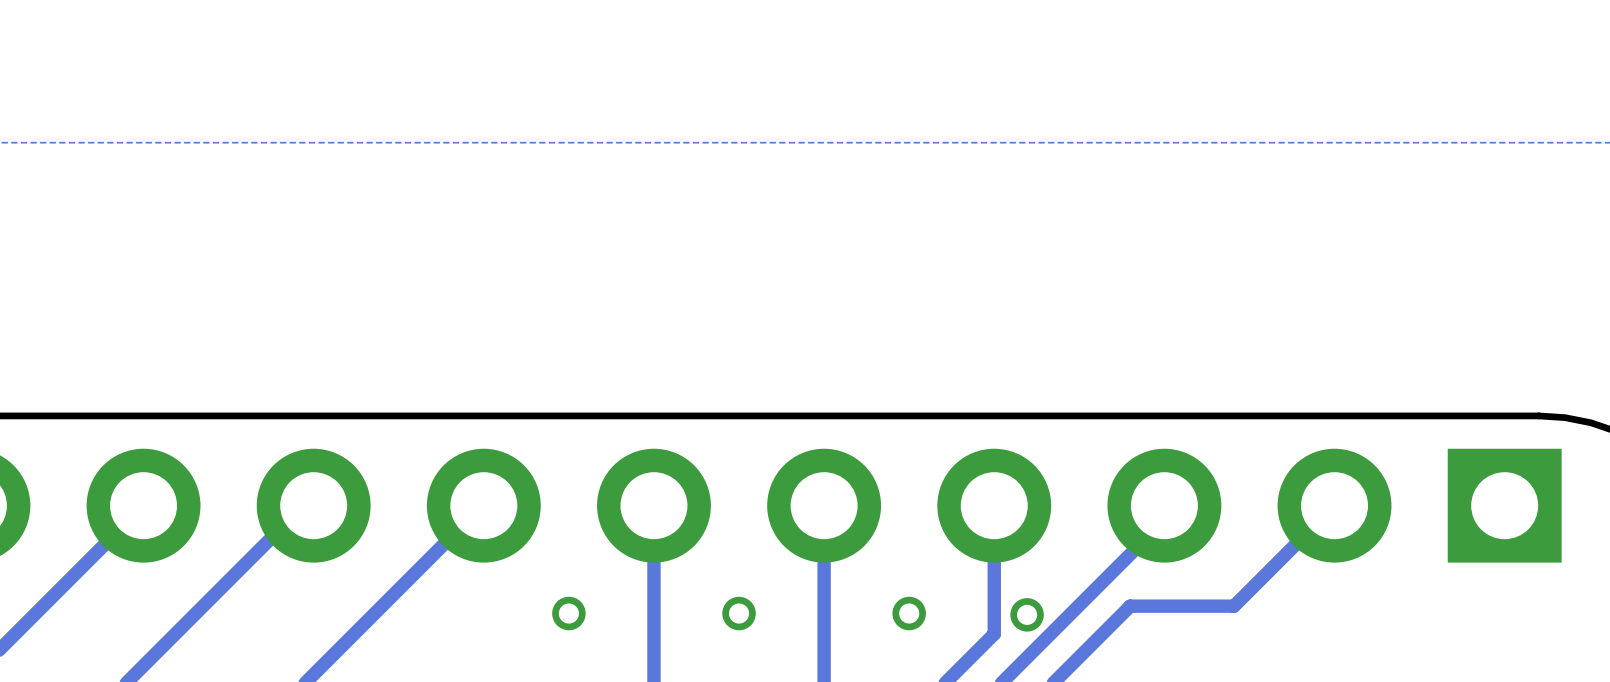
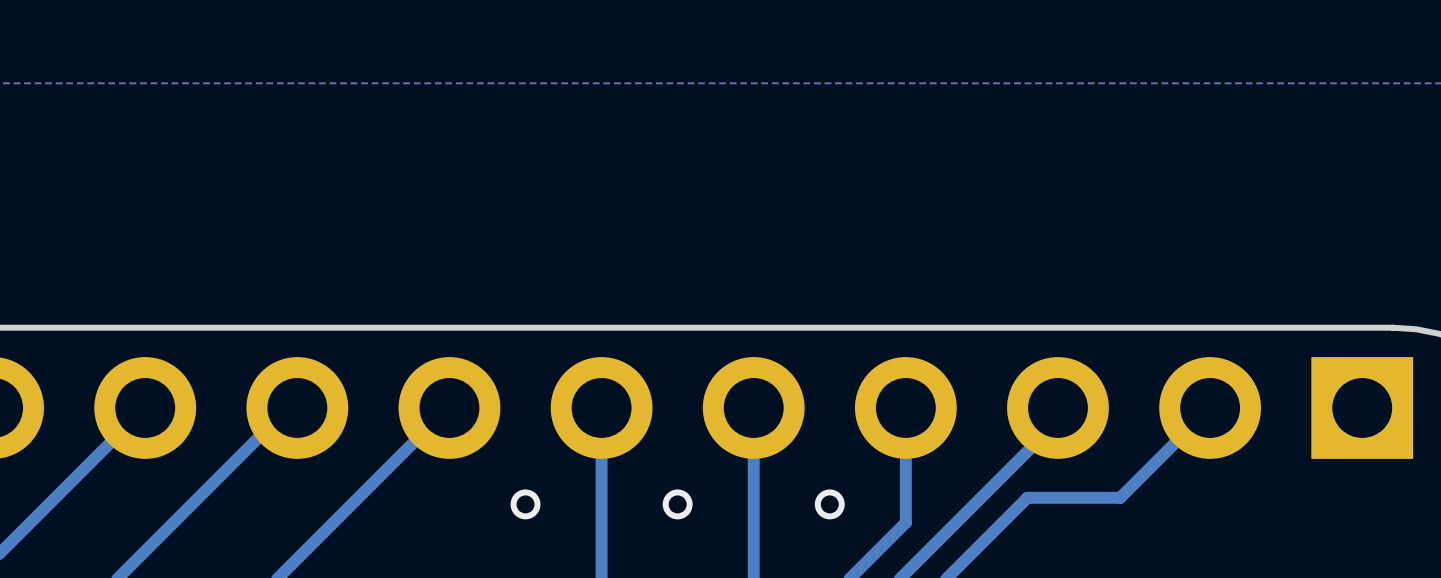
via: (1027, 614) -> none

